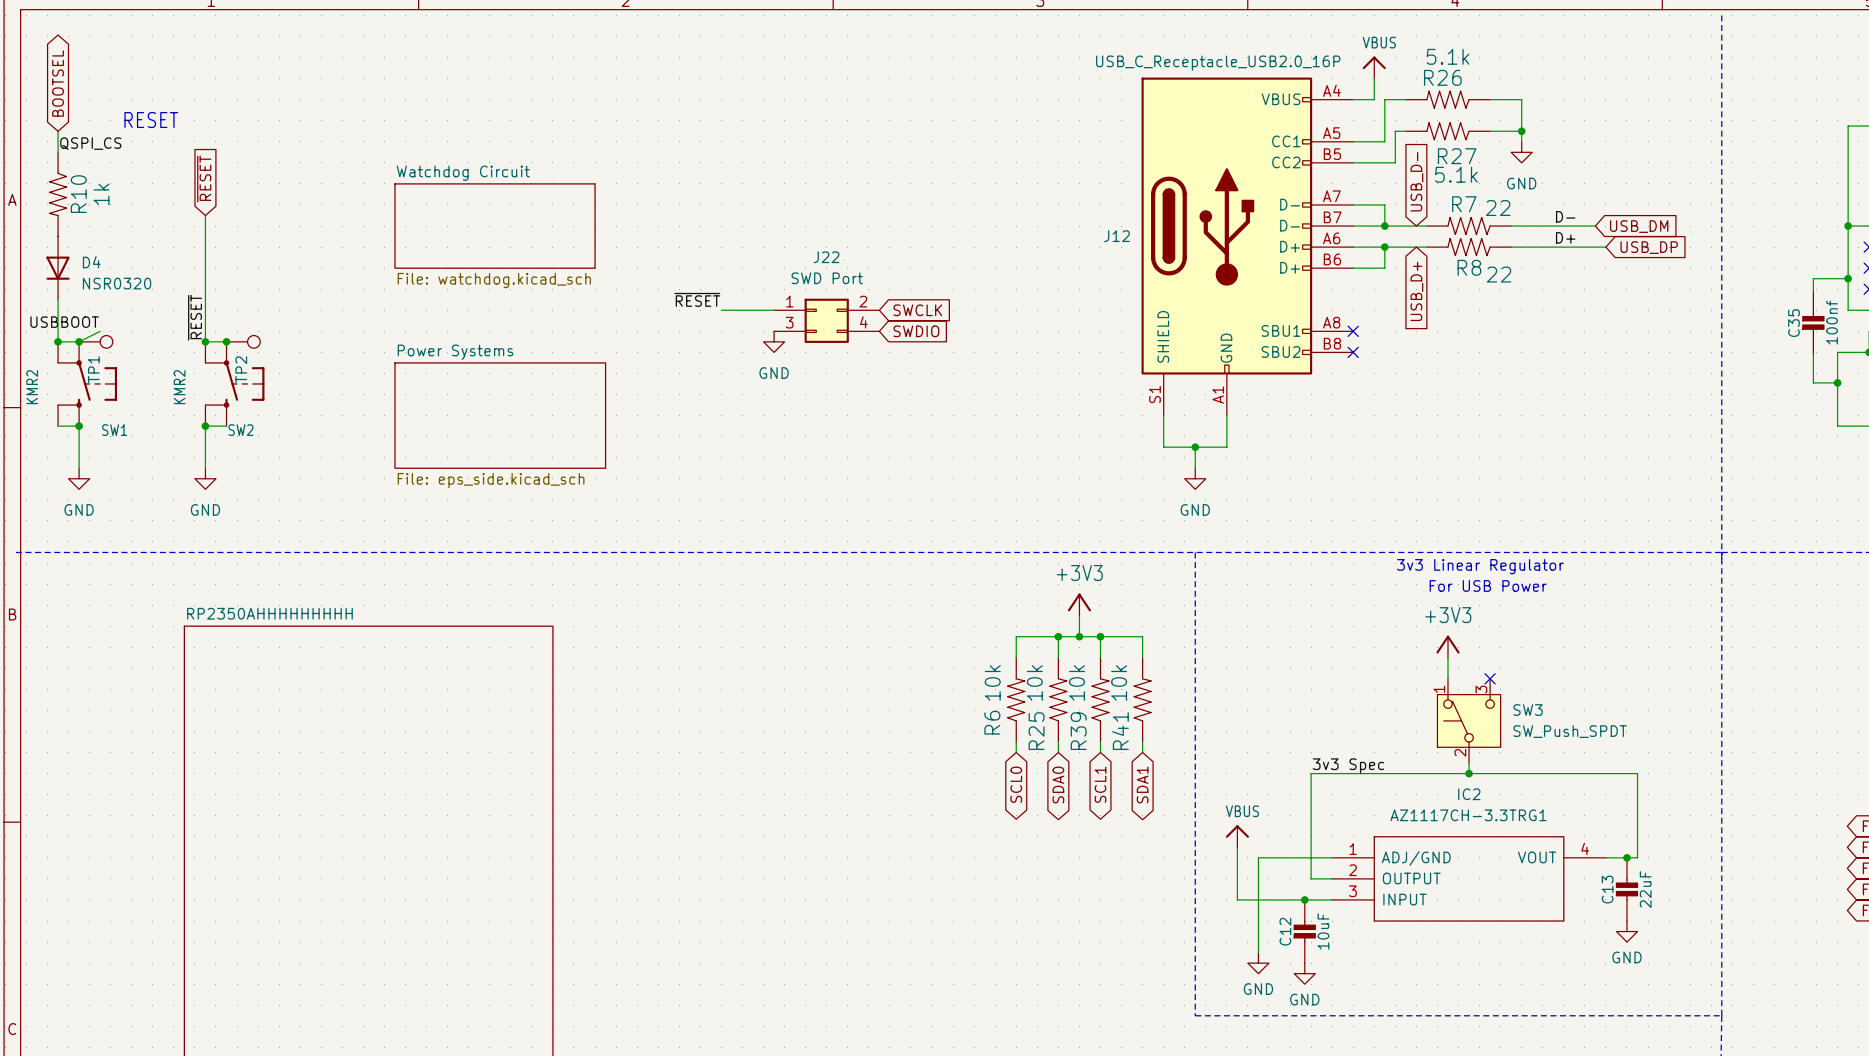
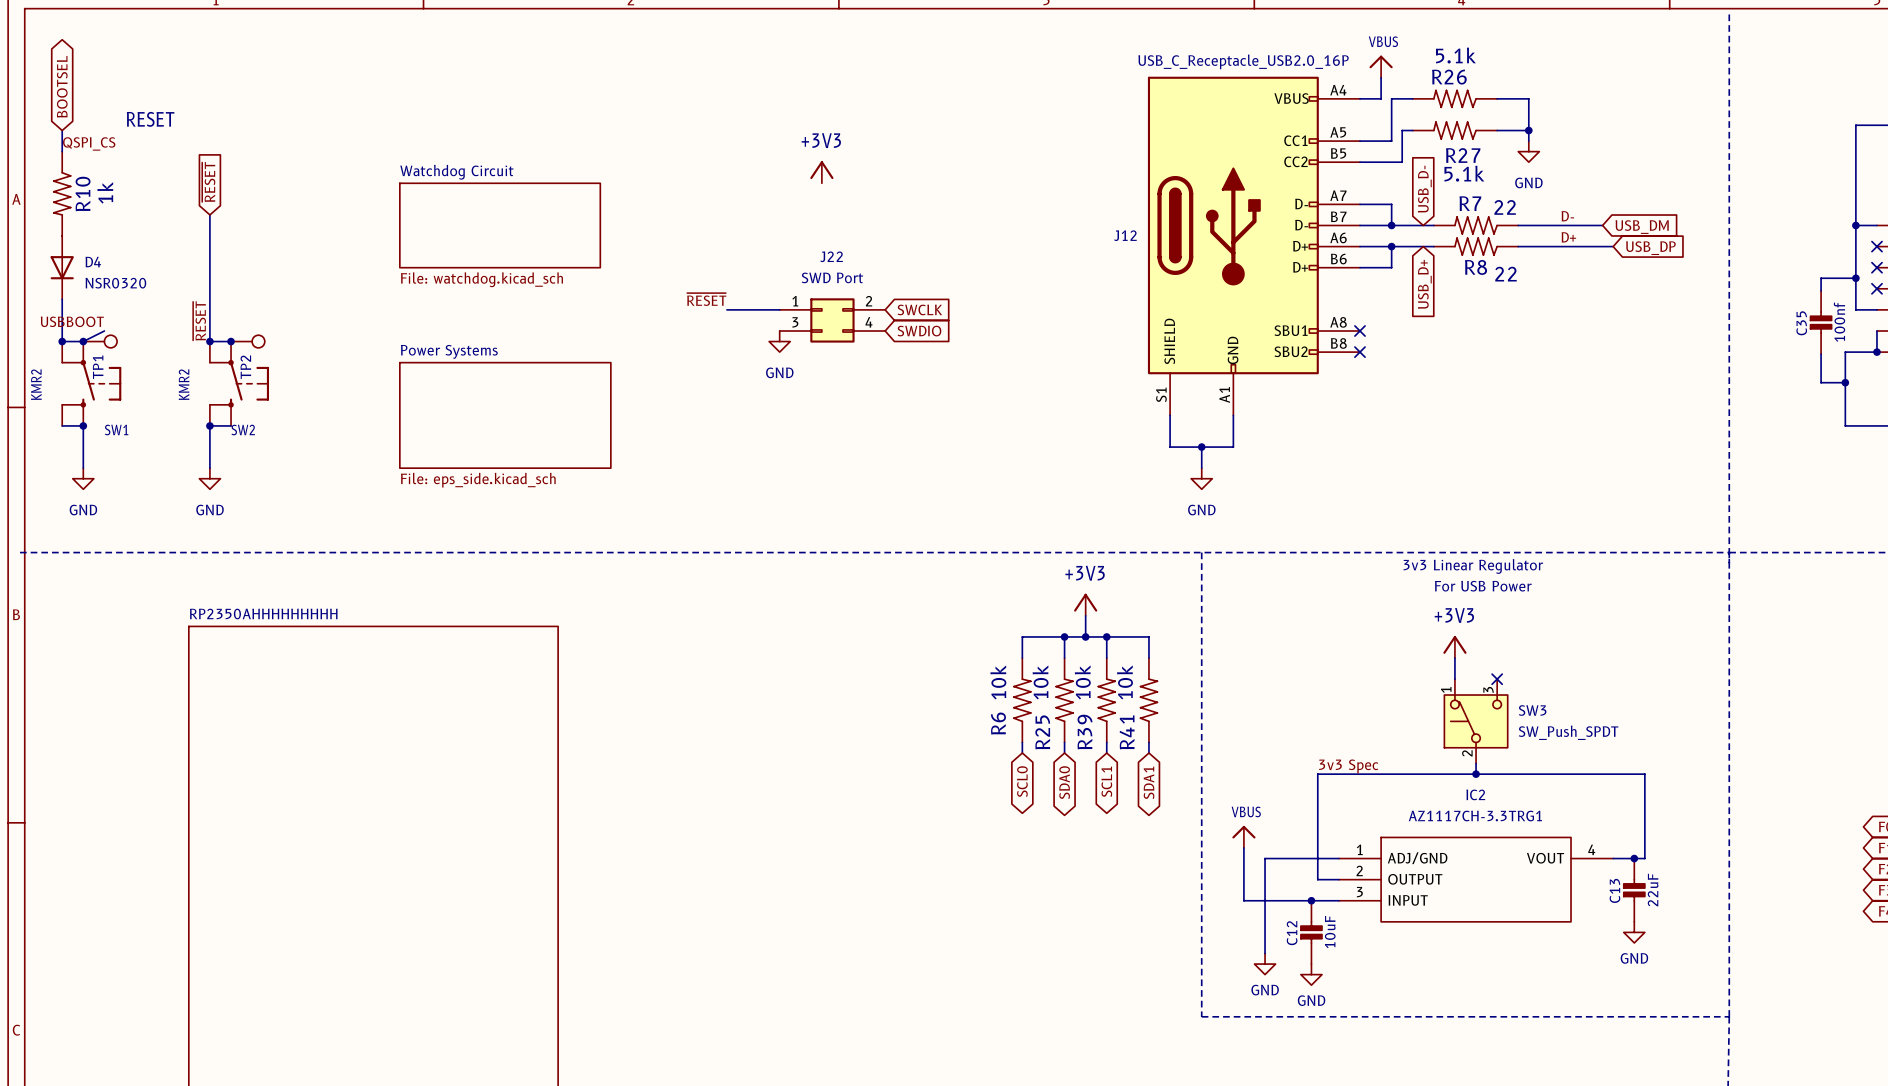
power symbol: none -> +3V3 (821, 172)

